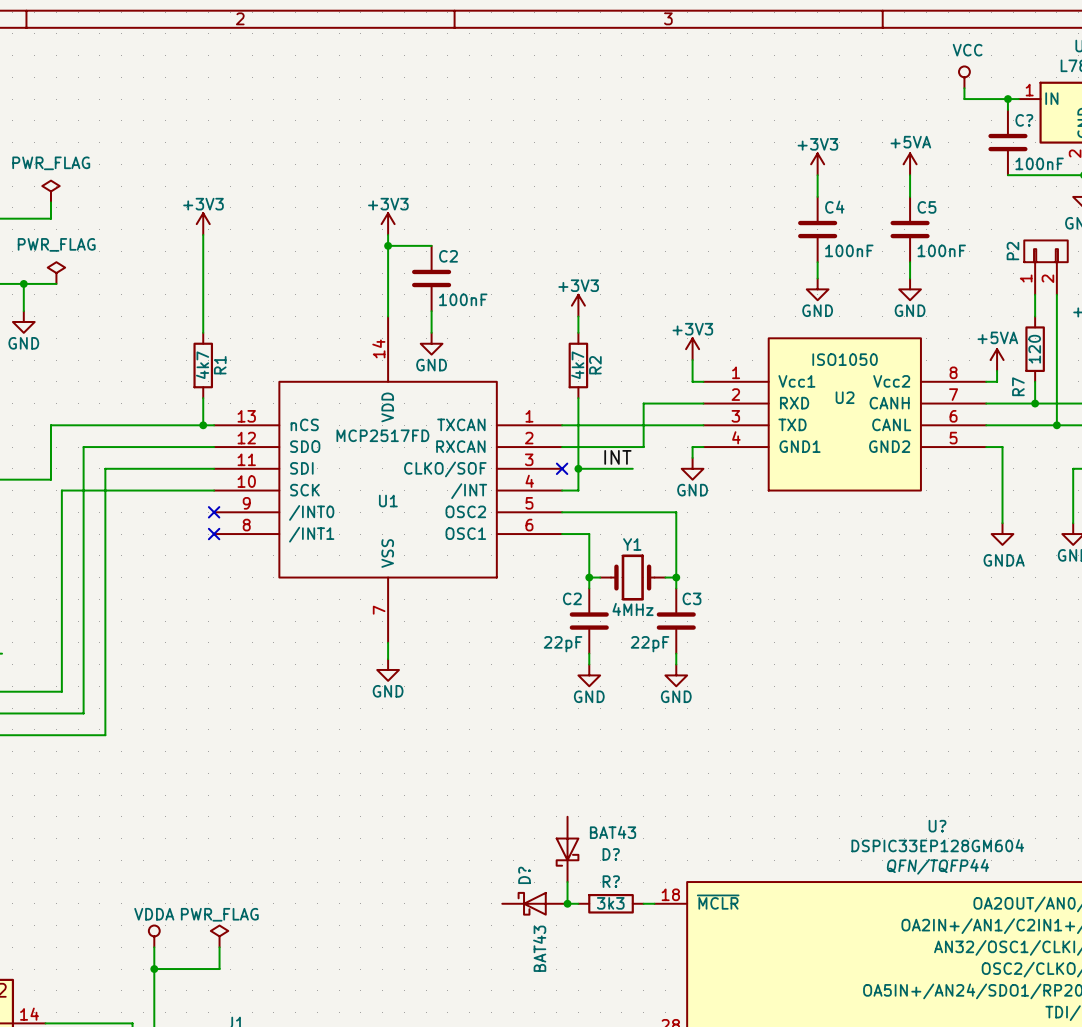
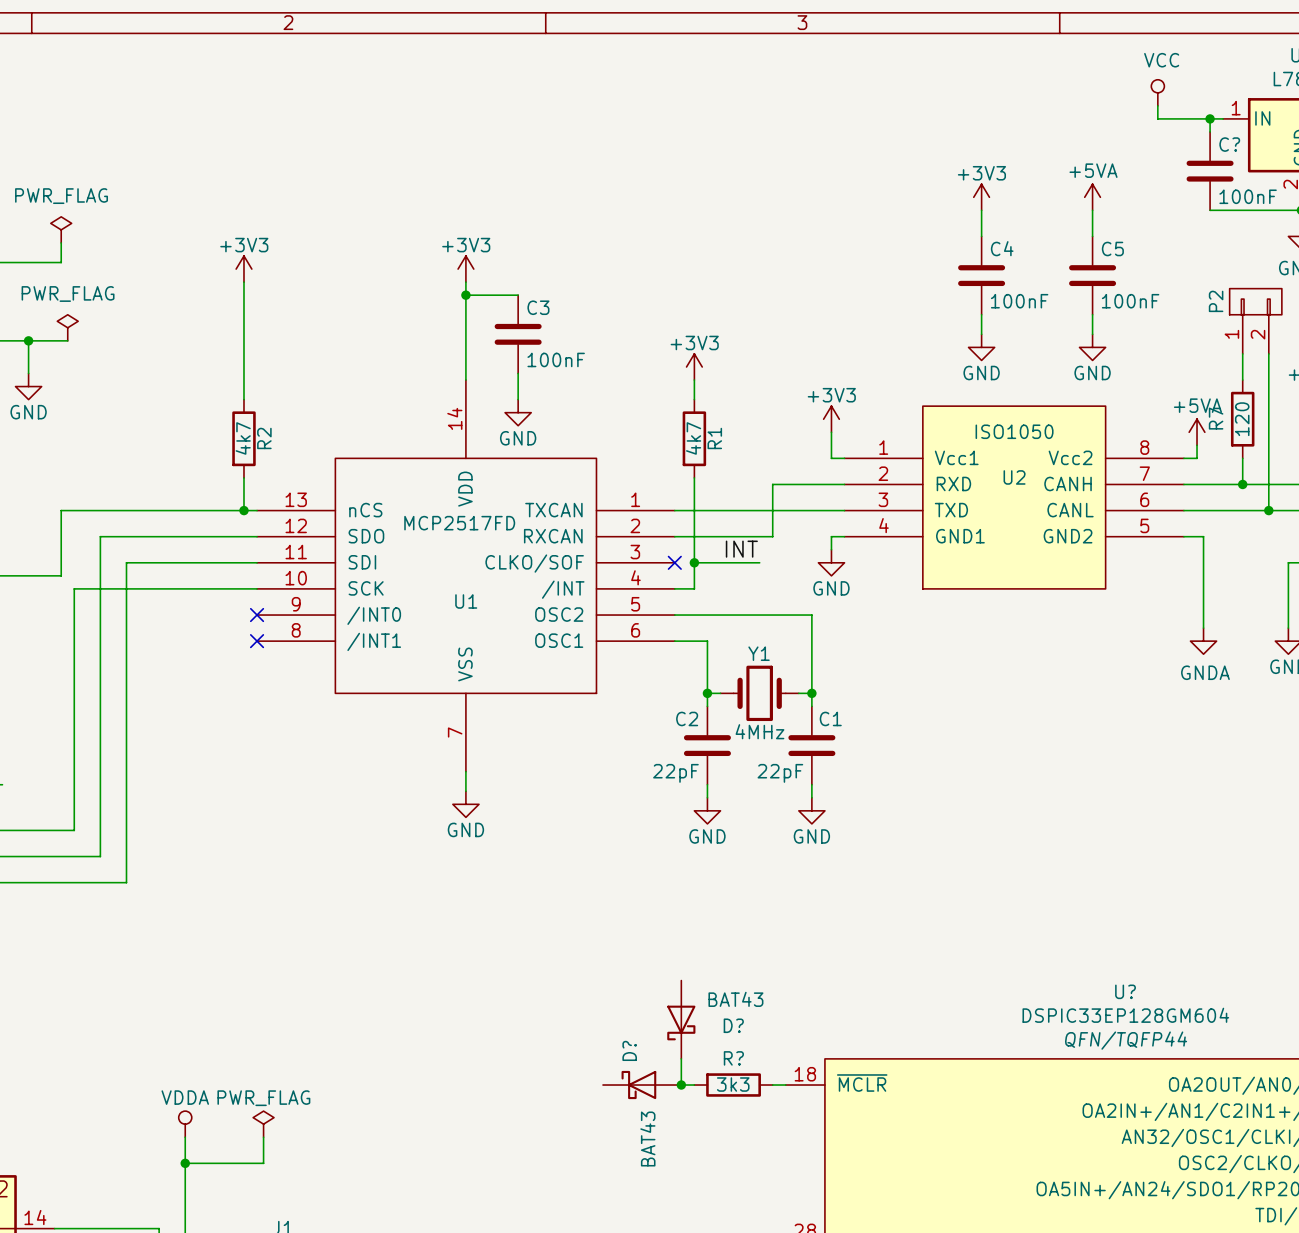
C2 name: C2 (448, 256) -> C3 (538, 307)
R1 name: R1 (220, 365) -> R2 (264, 438)
R2 name: R2 (595, 365) -> R1 (714, 438)
R7 name position: R7 (1018, 386) -> R7 (1216, 418)
C3 name: C3 (691, 598) -> C1 (830, 718)

